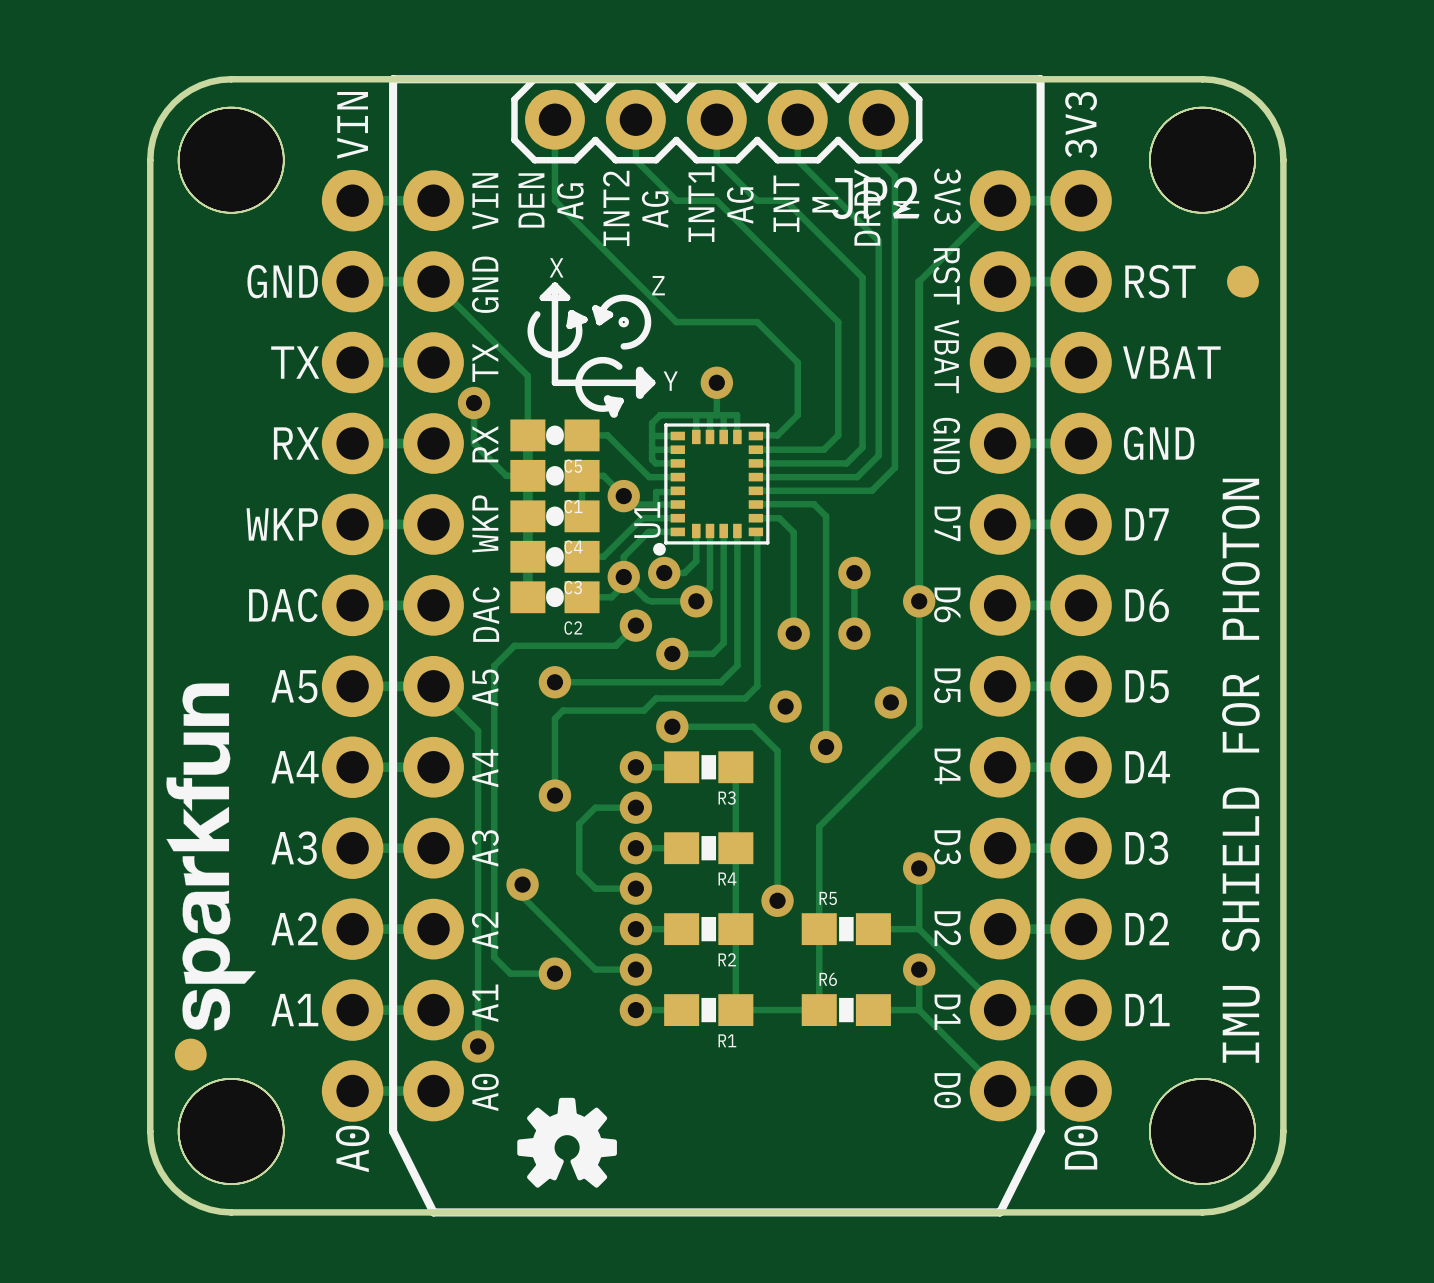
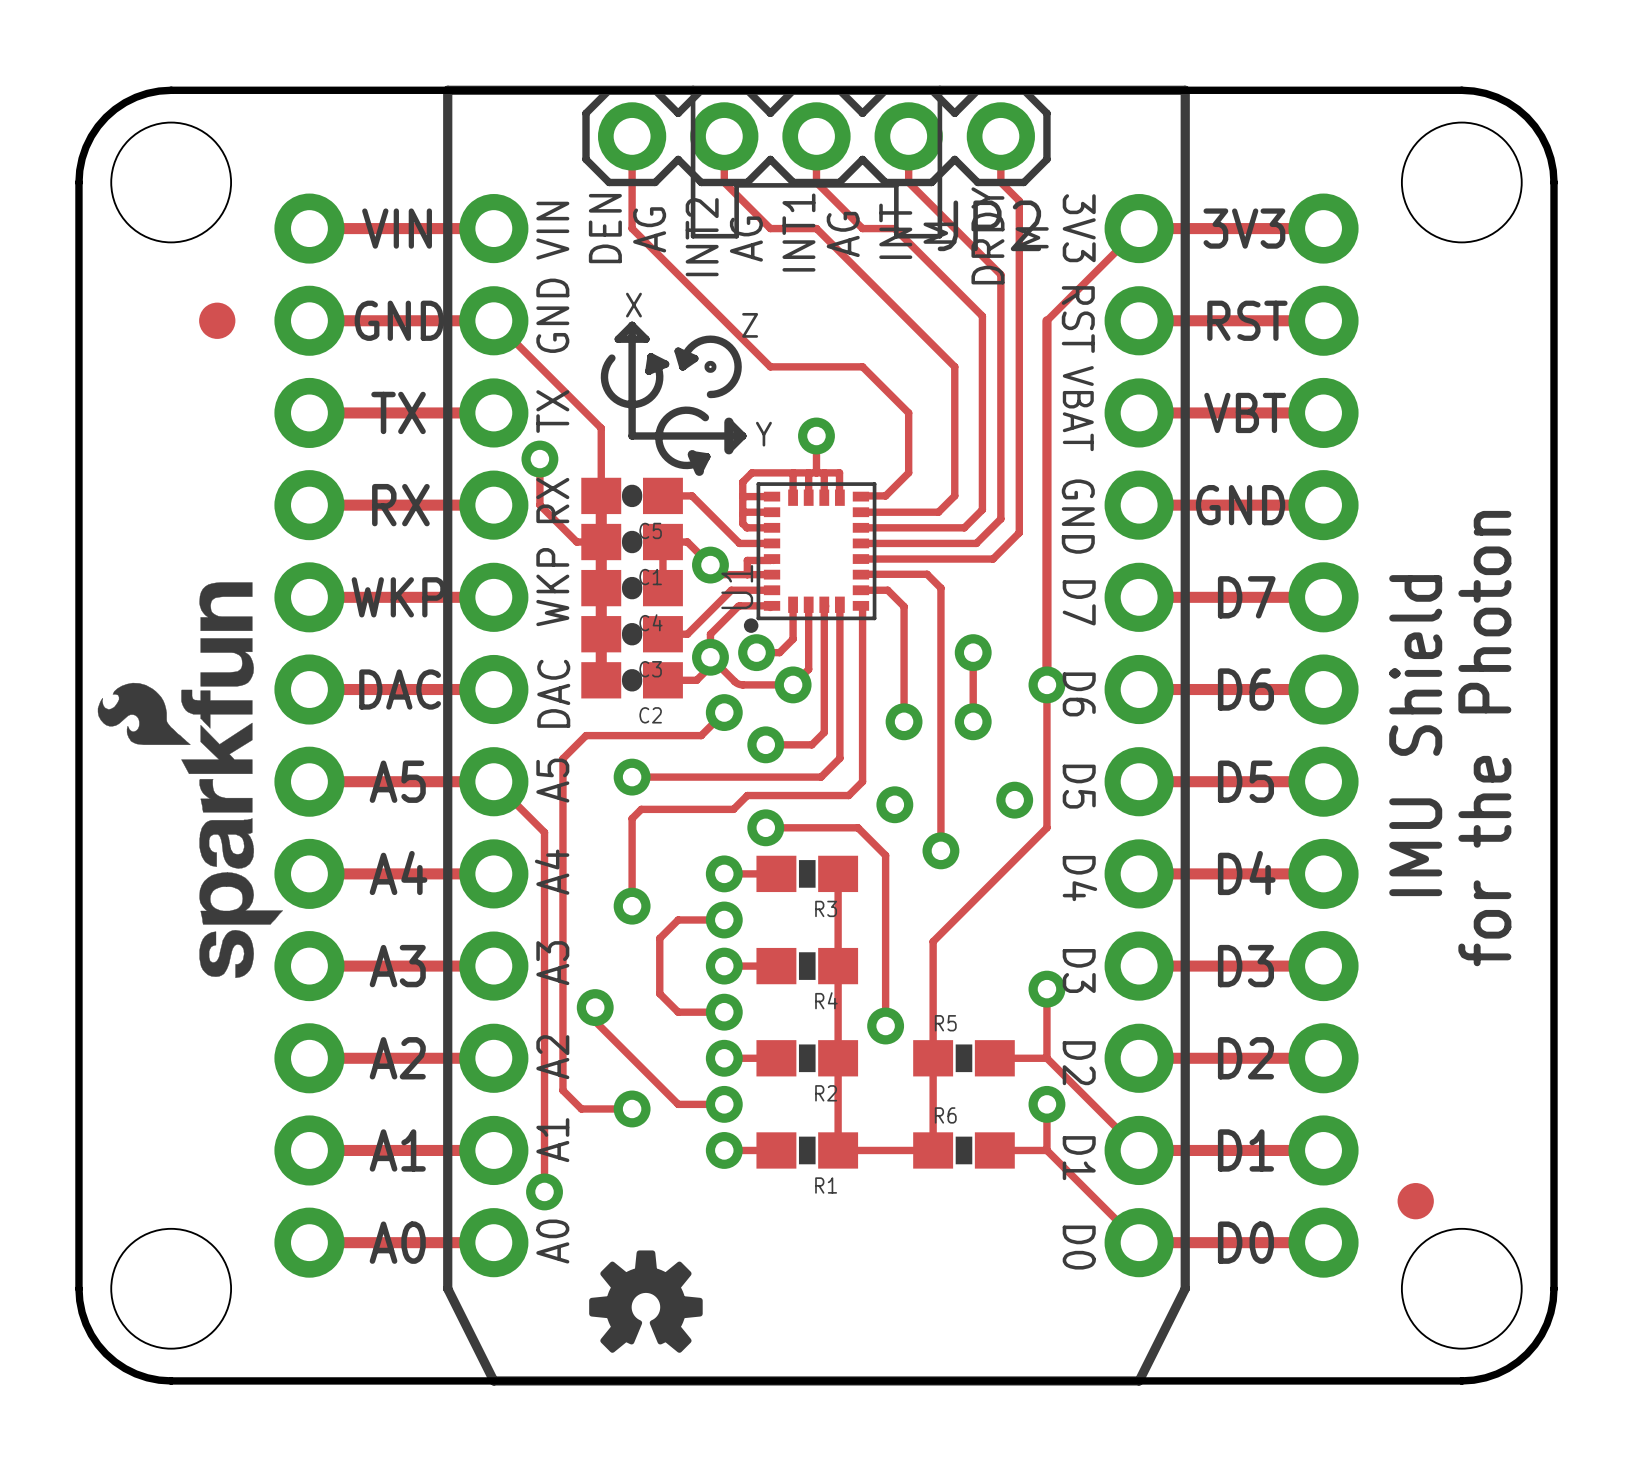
part footprint: [178, 75, 1256, 1217] -> [111, 85, 1522, 1386]
board edge: (231, 79) (200, 85) (173, 102) (156, 129) (150, 160) (150, 1142) (156, 1162) (173, 1188) (200, 1206) (231, 1212) -> (263, 90) (159, 91) (147, 93) (125, 102) (105, 117) (91, 136) (82, 158) (78, 182) (79, 1300) (85, 1324) (98, 1344) (115, 1361) (135, 1373) (147, 1377) (171, 1380) (263, 1380)
board edge: (1202, 79) (1233, 85) (1259, 102) (1277, 129) (1283, 160) (1282, 1142) (1277, 1162) (1259, 1188) (1233, 1206) (1202, 1212) -> (1369, 90) (1473, 91) (1485, 93) (1507, 102) (1527, 117) (1541, 136) (1550, 158) (1553, 182) (1553, 1300) (1546, 1324) (1534, 1344) (1517, 1361) (1497, 1373) (1485, 1377) (1461, 1380) (1369, 1380)
part: (231, 160) -> none
part: (1202, 160) -> none
part: none -> (217, 320)
part: (1242, 281) -> none
drawing: none -> [97, 582, 283, 978]
text: none -> IMU Shield (1415, 735)
text: none -> for the Photon (1484, 738)
drawing: [166, 683, 256, 1031] -> none
text: IMU SHIELD FOR PHOTON (1240, 770) -> none
part: (190, 1054) -> none
part: none -> (1415, 1201)
part: (231, 1131) -> none
part: (1202, 1131) -> none

